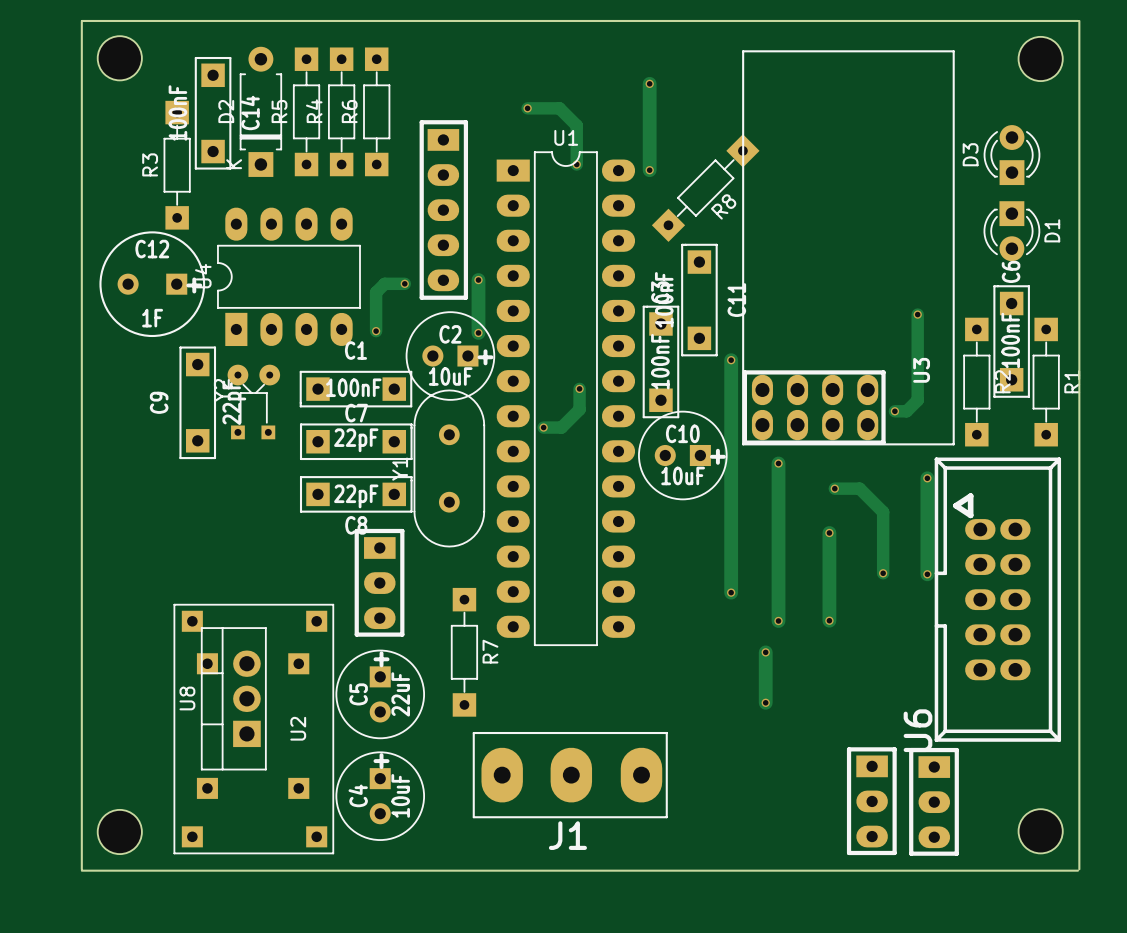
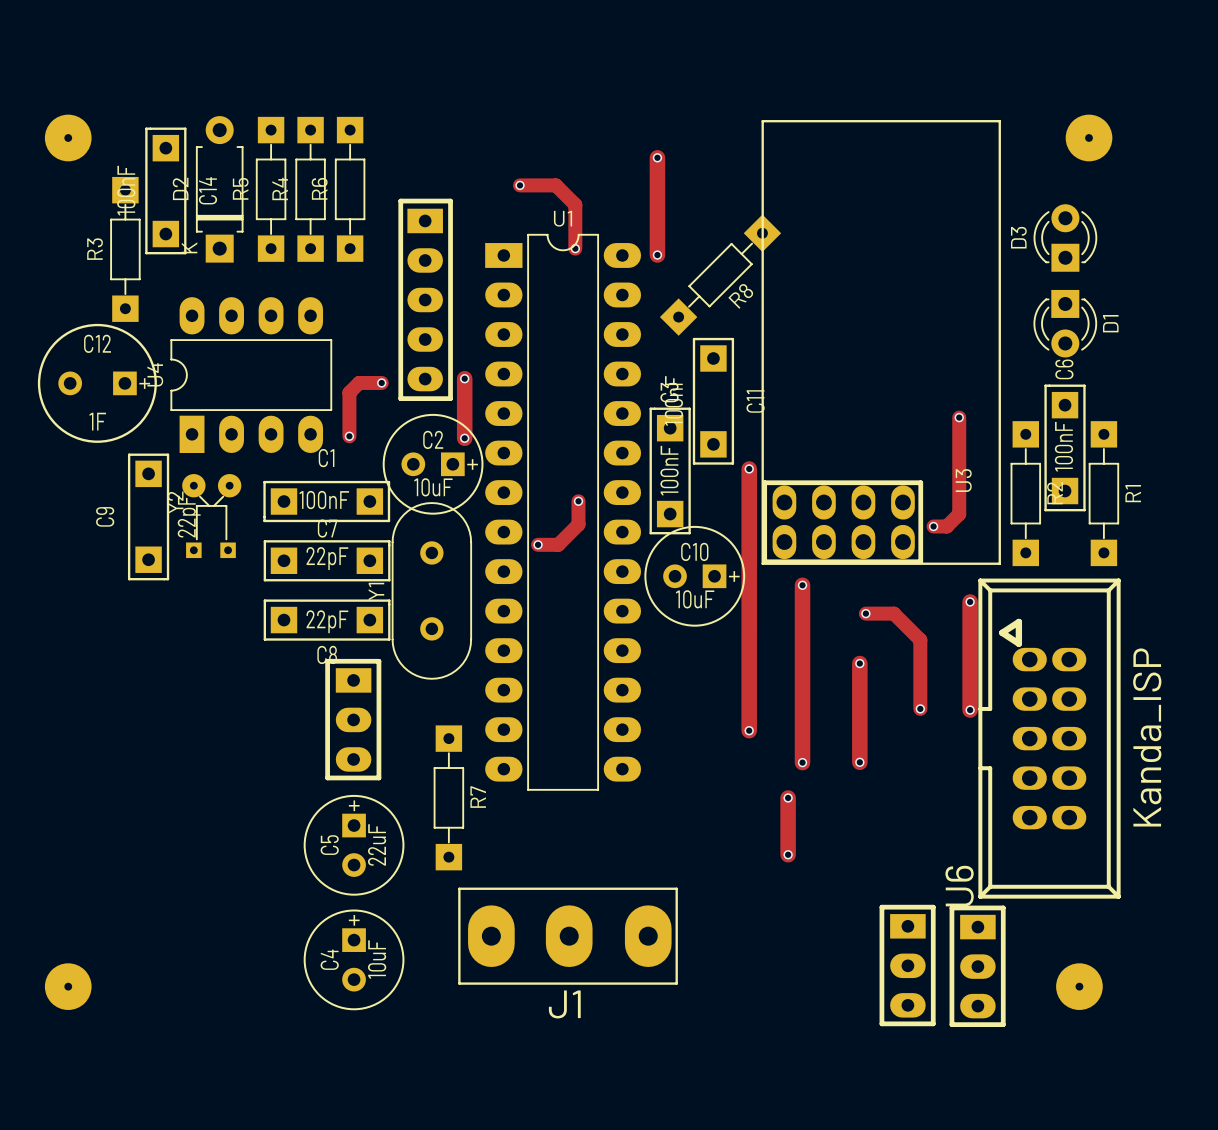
board edge: (81, 20) (1077, 20) -> none
board edge: (1079, 20) (1079, 869) -> none
board edge: (81, 21) (81, 869) -> none
part footprint: [97, 36, 142, 81] -> [44, 114, 92, 162]
part footprint: [1018, 36, 1063, 82] -> [1065, 114, 1113, 162]
U6 value: none -> Kanda_ISP (1147, 737)
U8: (233, 698) -> none
U2: (253, 729) -> none
part footprint: [97, 809, 142, 855] -> [44, 963, 92, 1010]
part: none -> (1079, 986)
part: (1040, 831) -> none
board edge: (81, 870) (1077, 870) -> none

